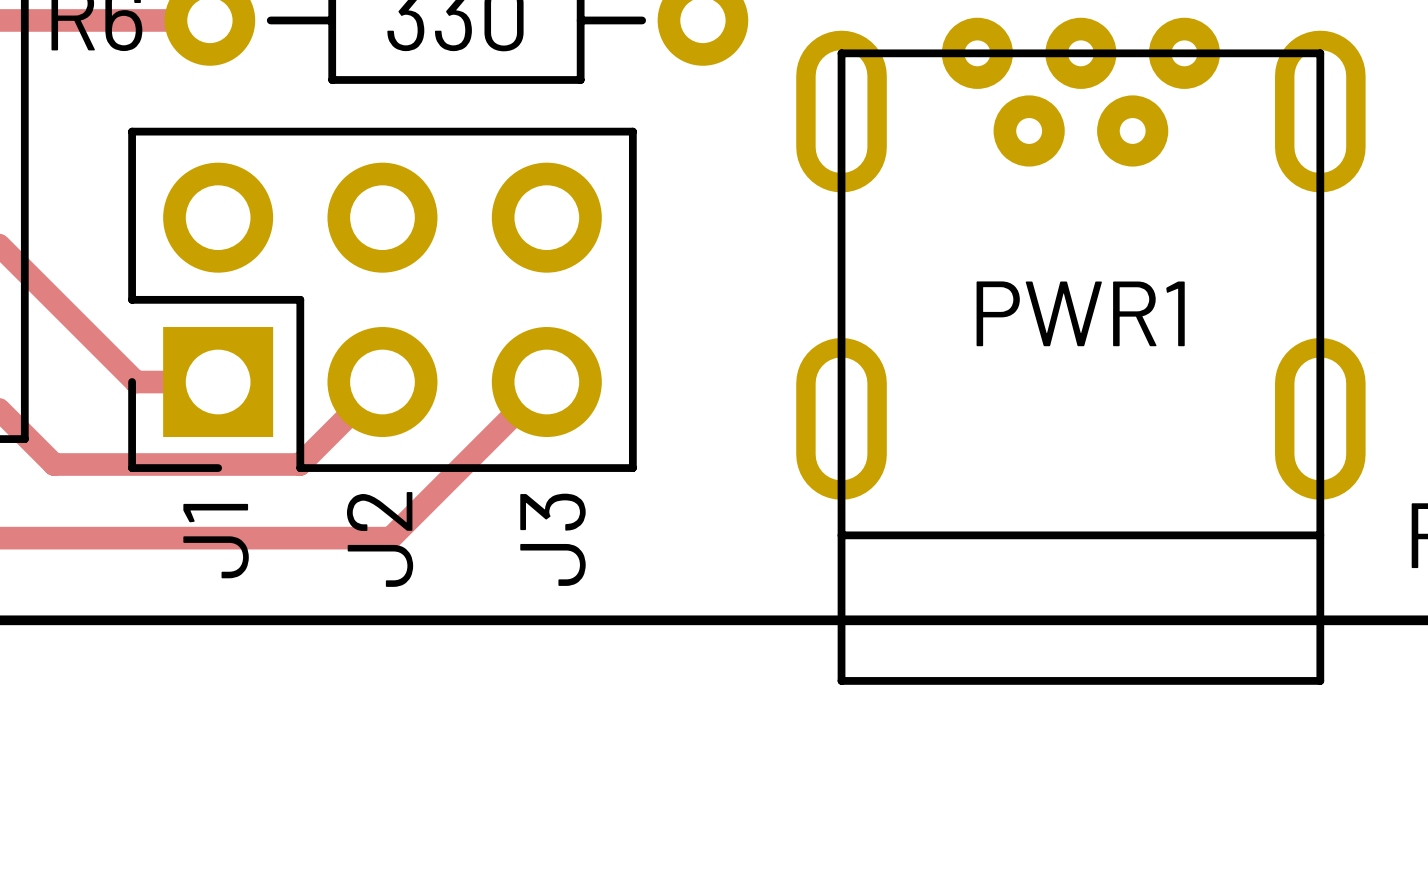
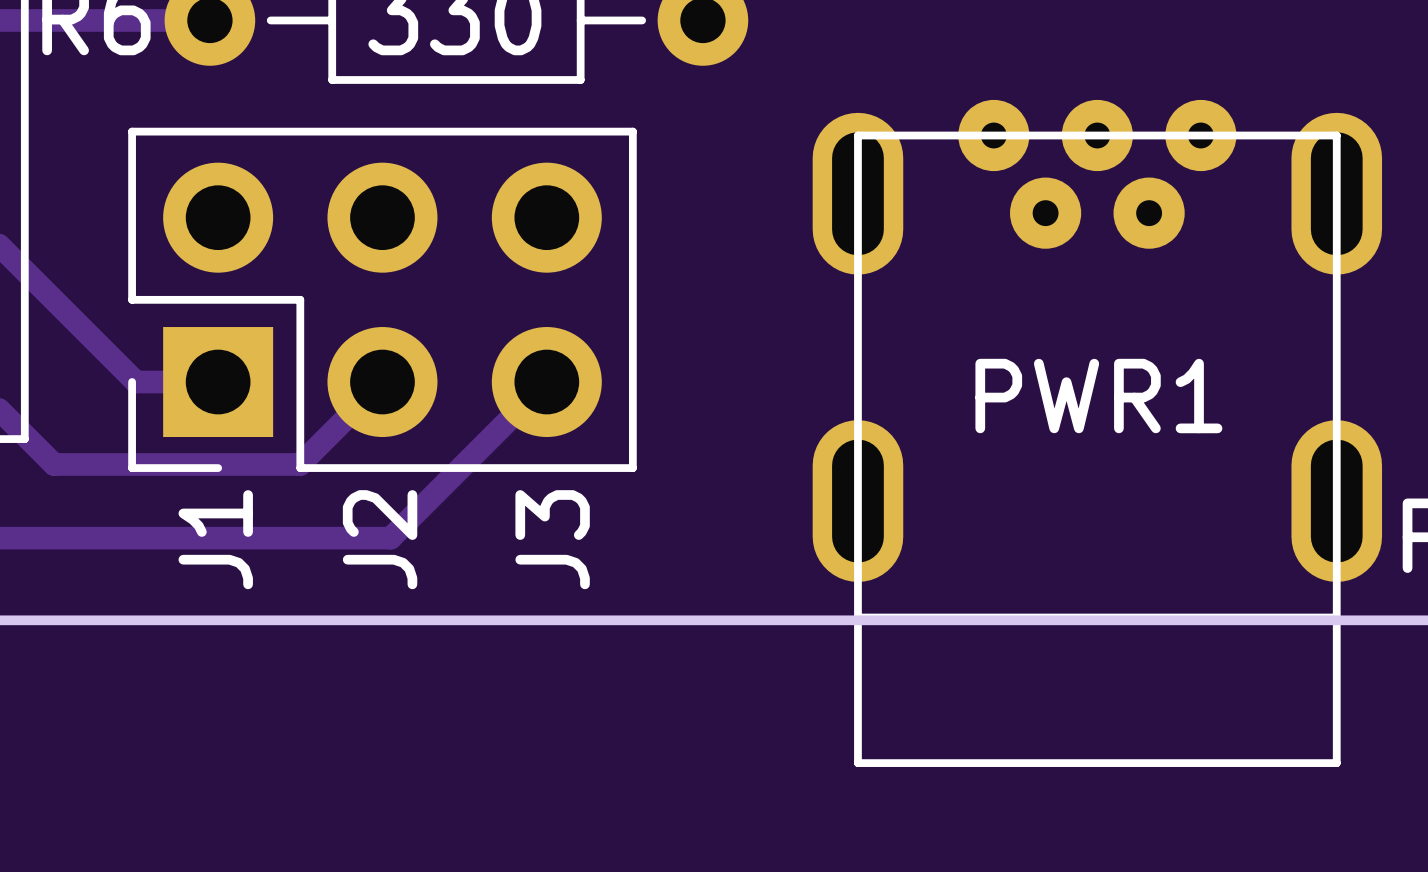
PWR1 position: (1080, 351) -> (1097, 433)

